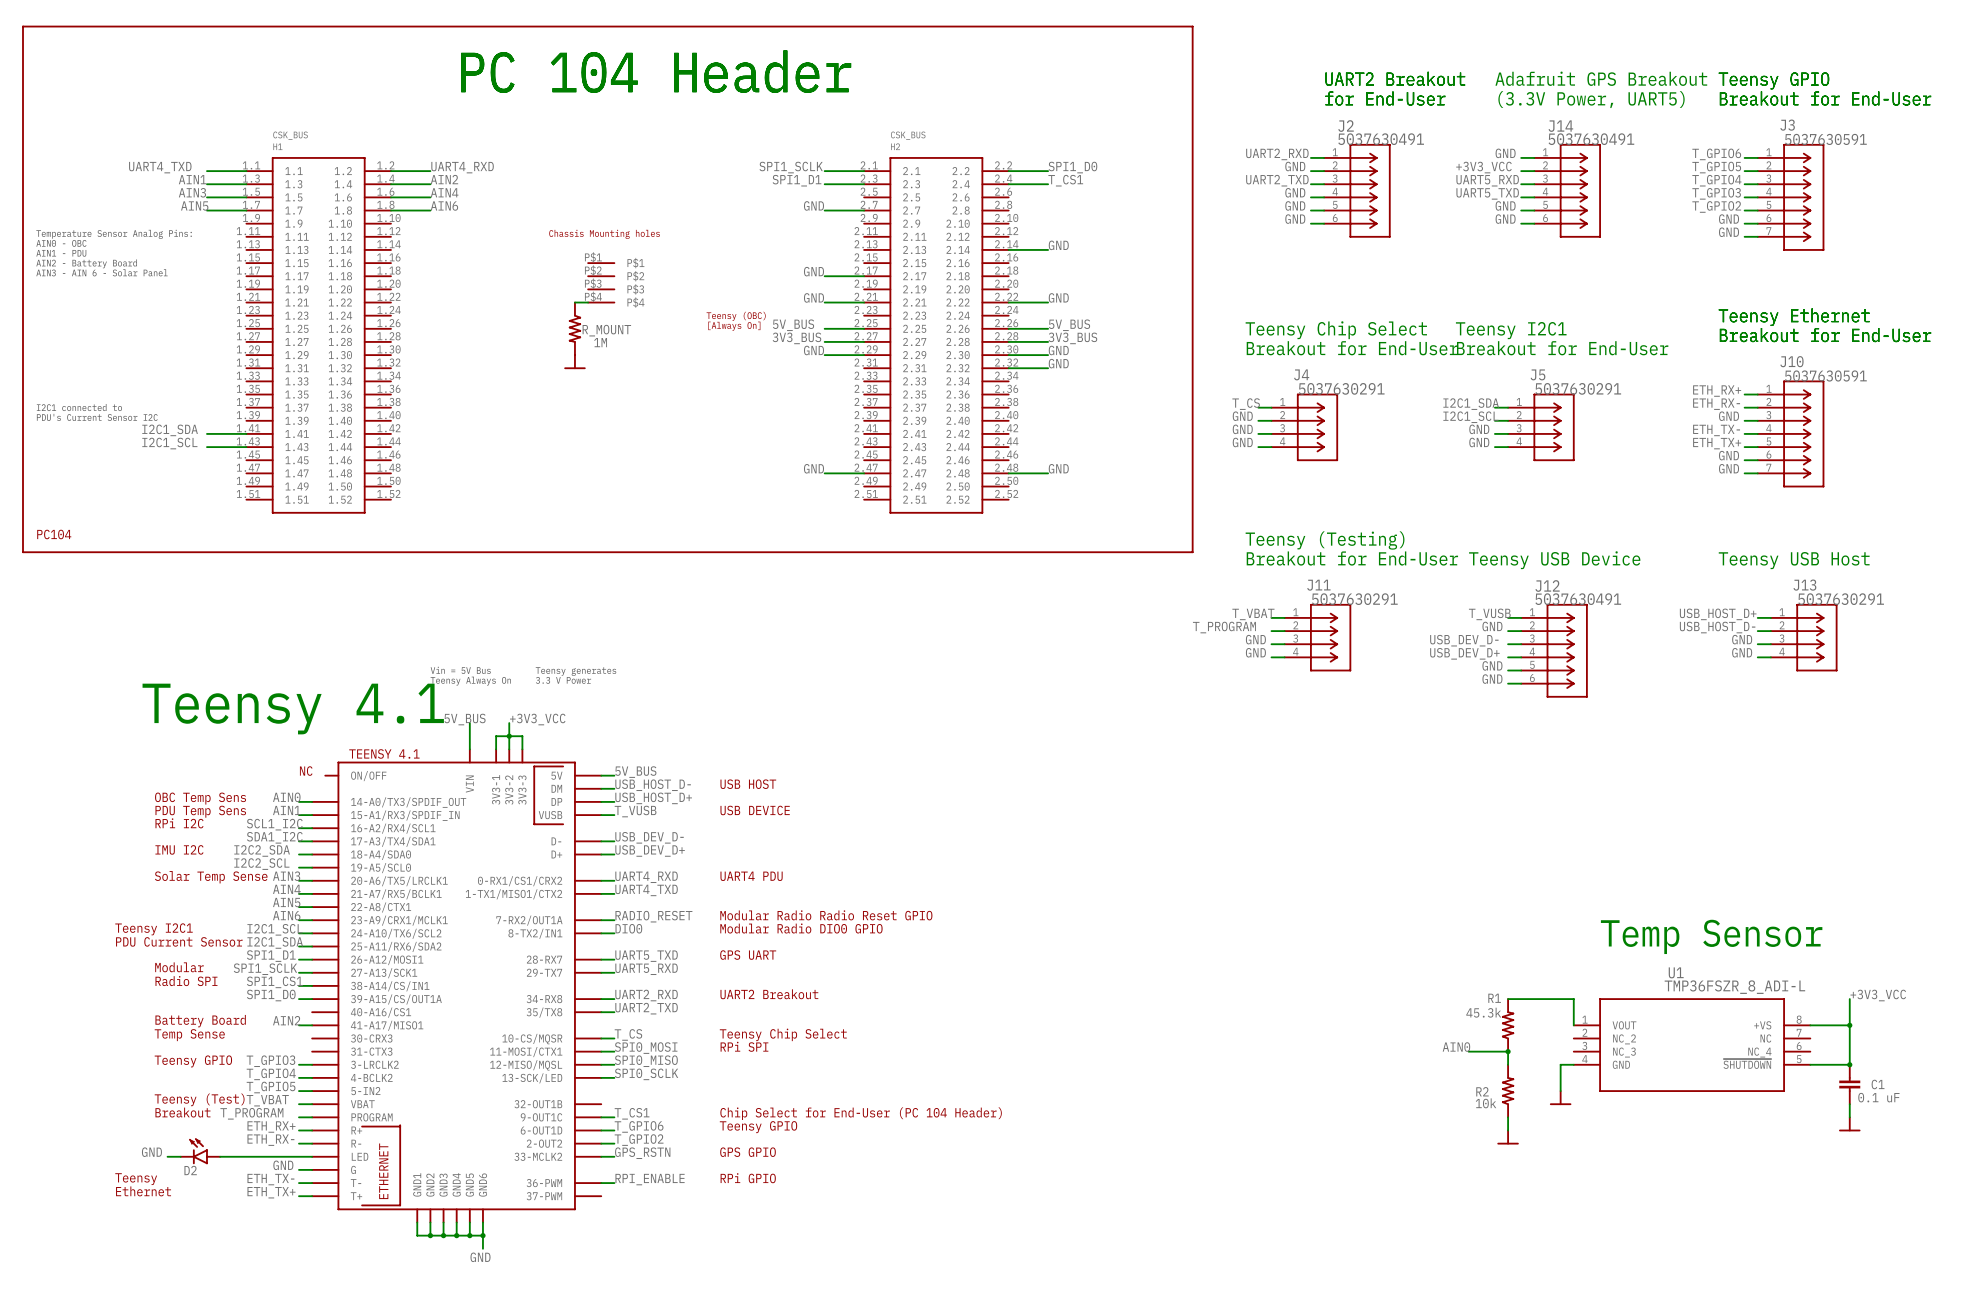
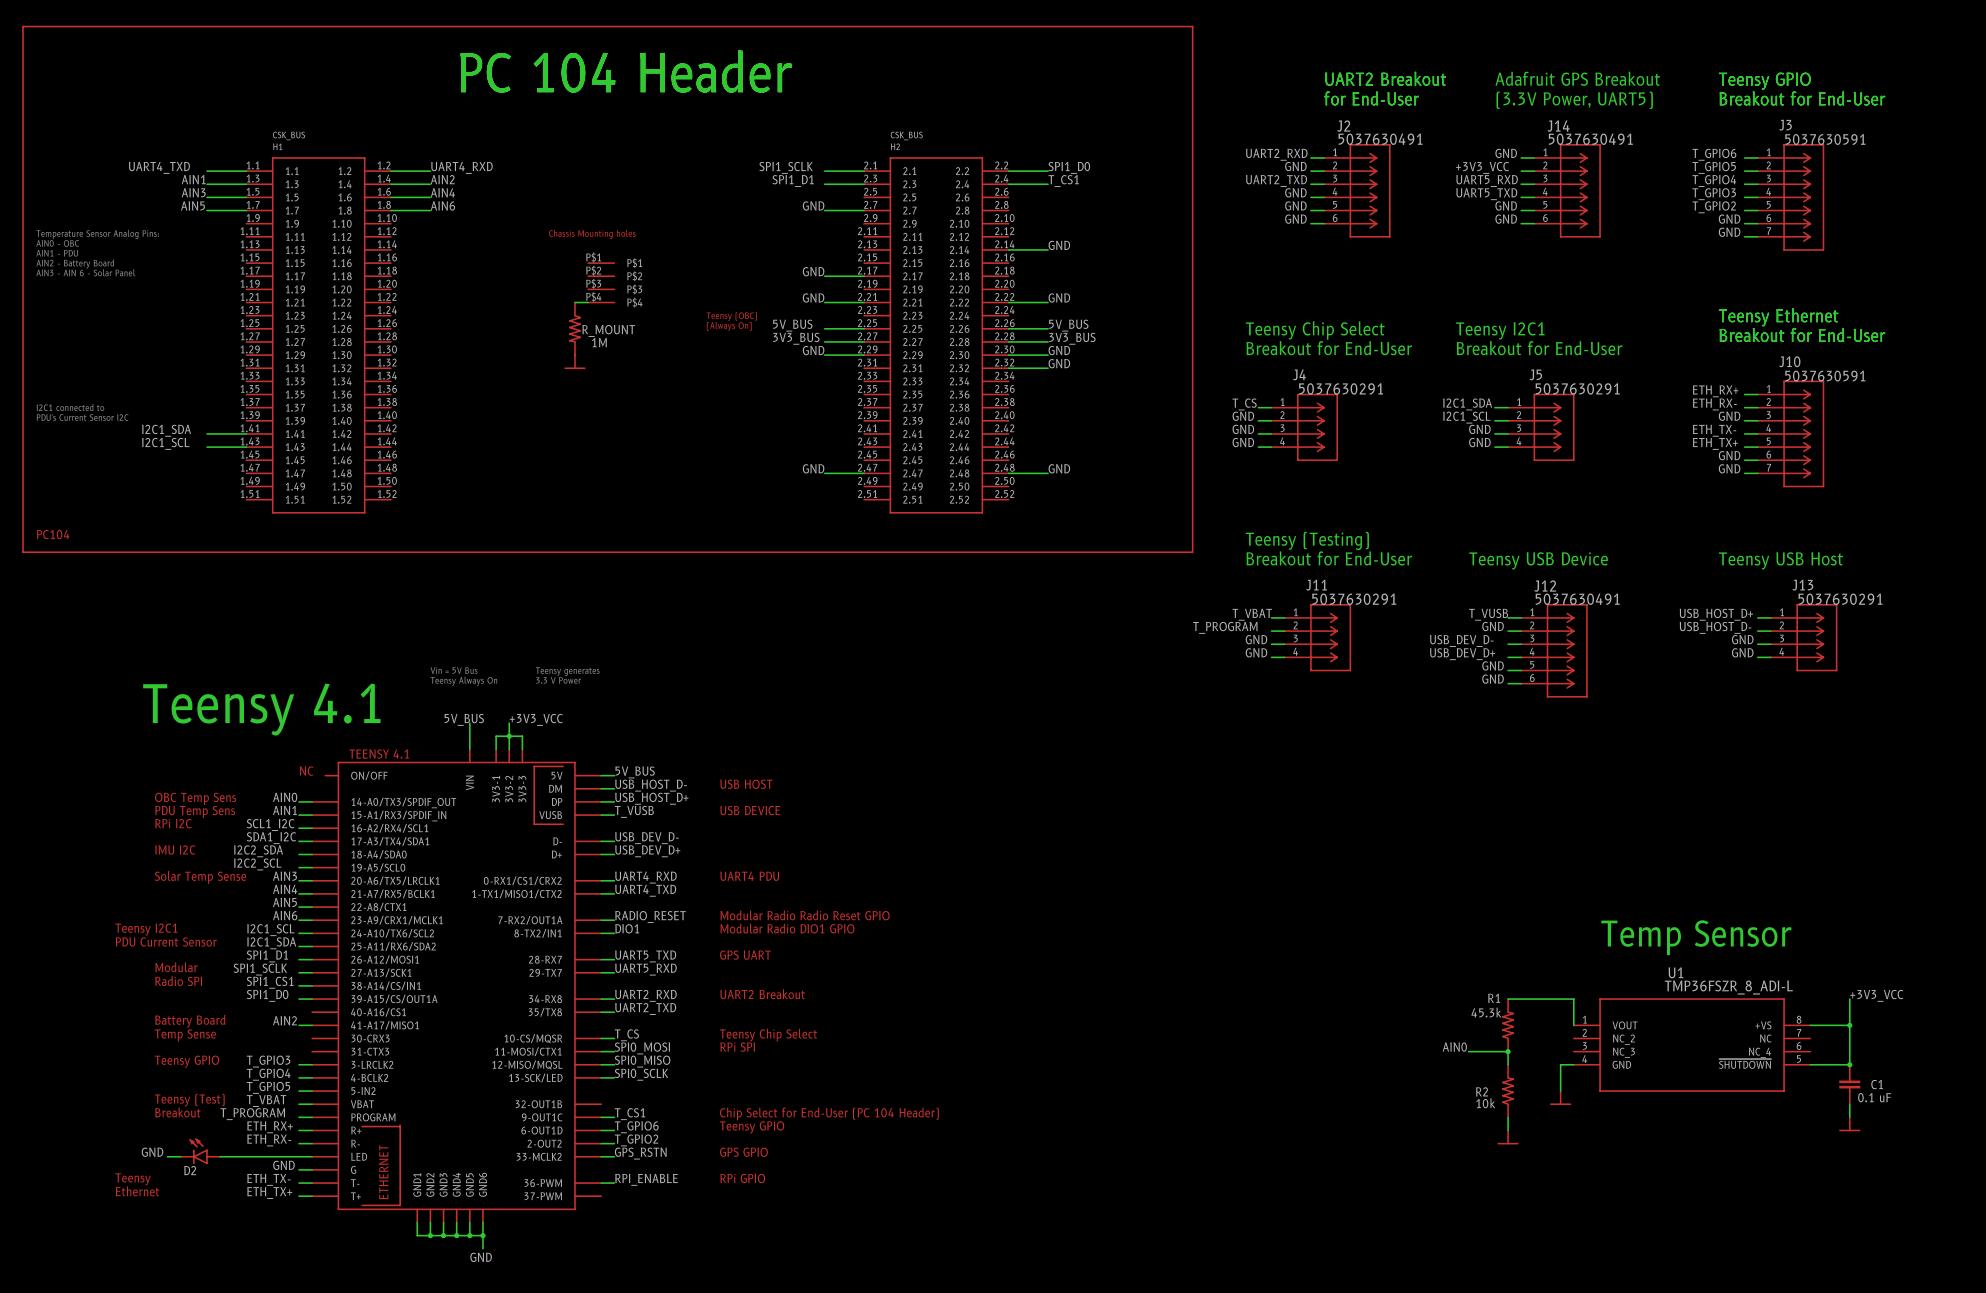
label: DIO0 (628, 928) -> DIO1 (627, 928)
text: Modular Radio DIO0 GPIO (801, 928) -> Modular Radio DIO1 GPIO (787, 928)

